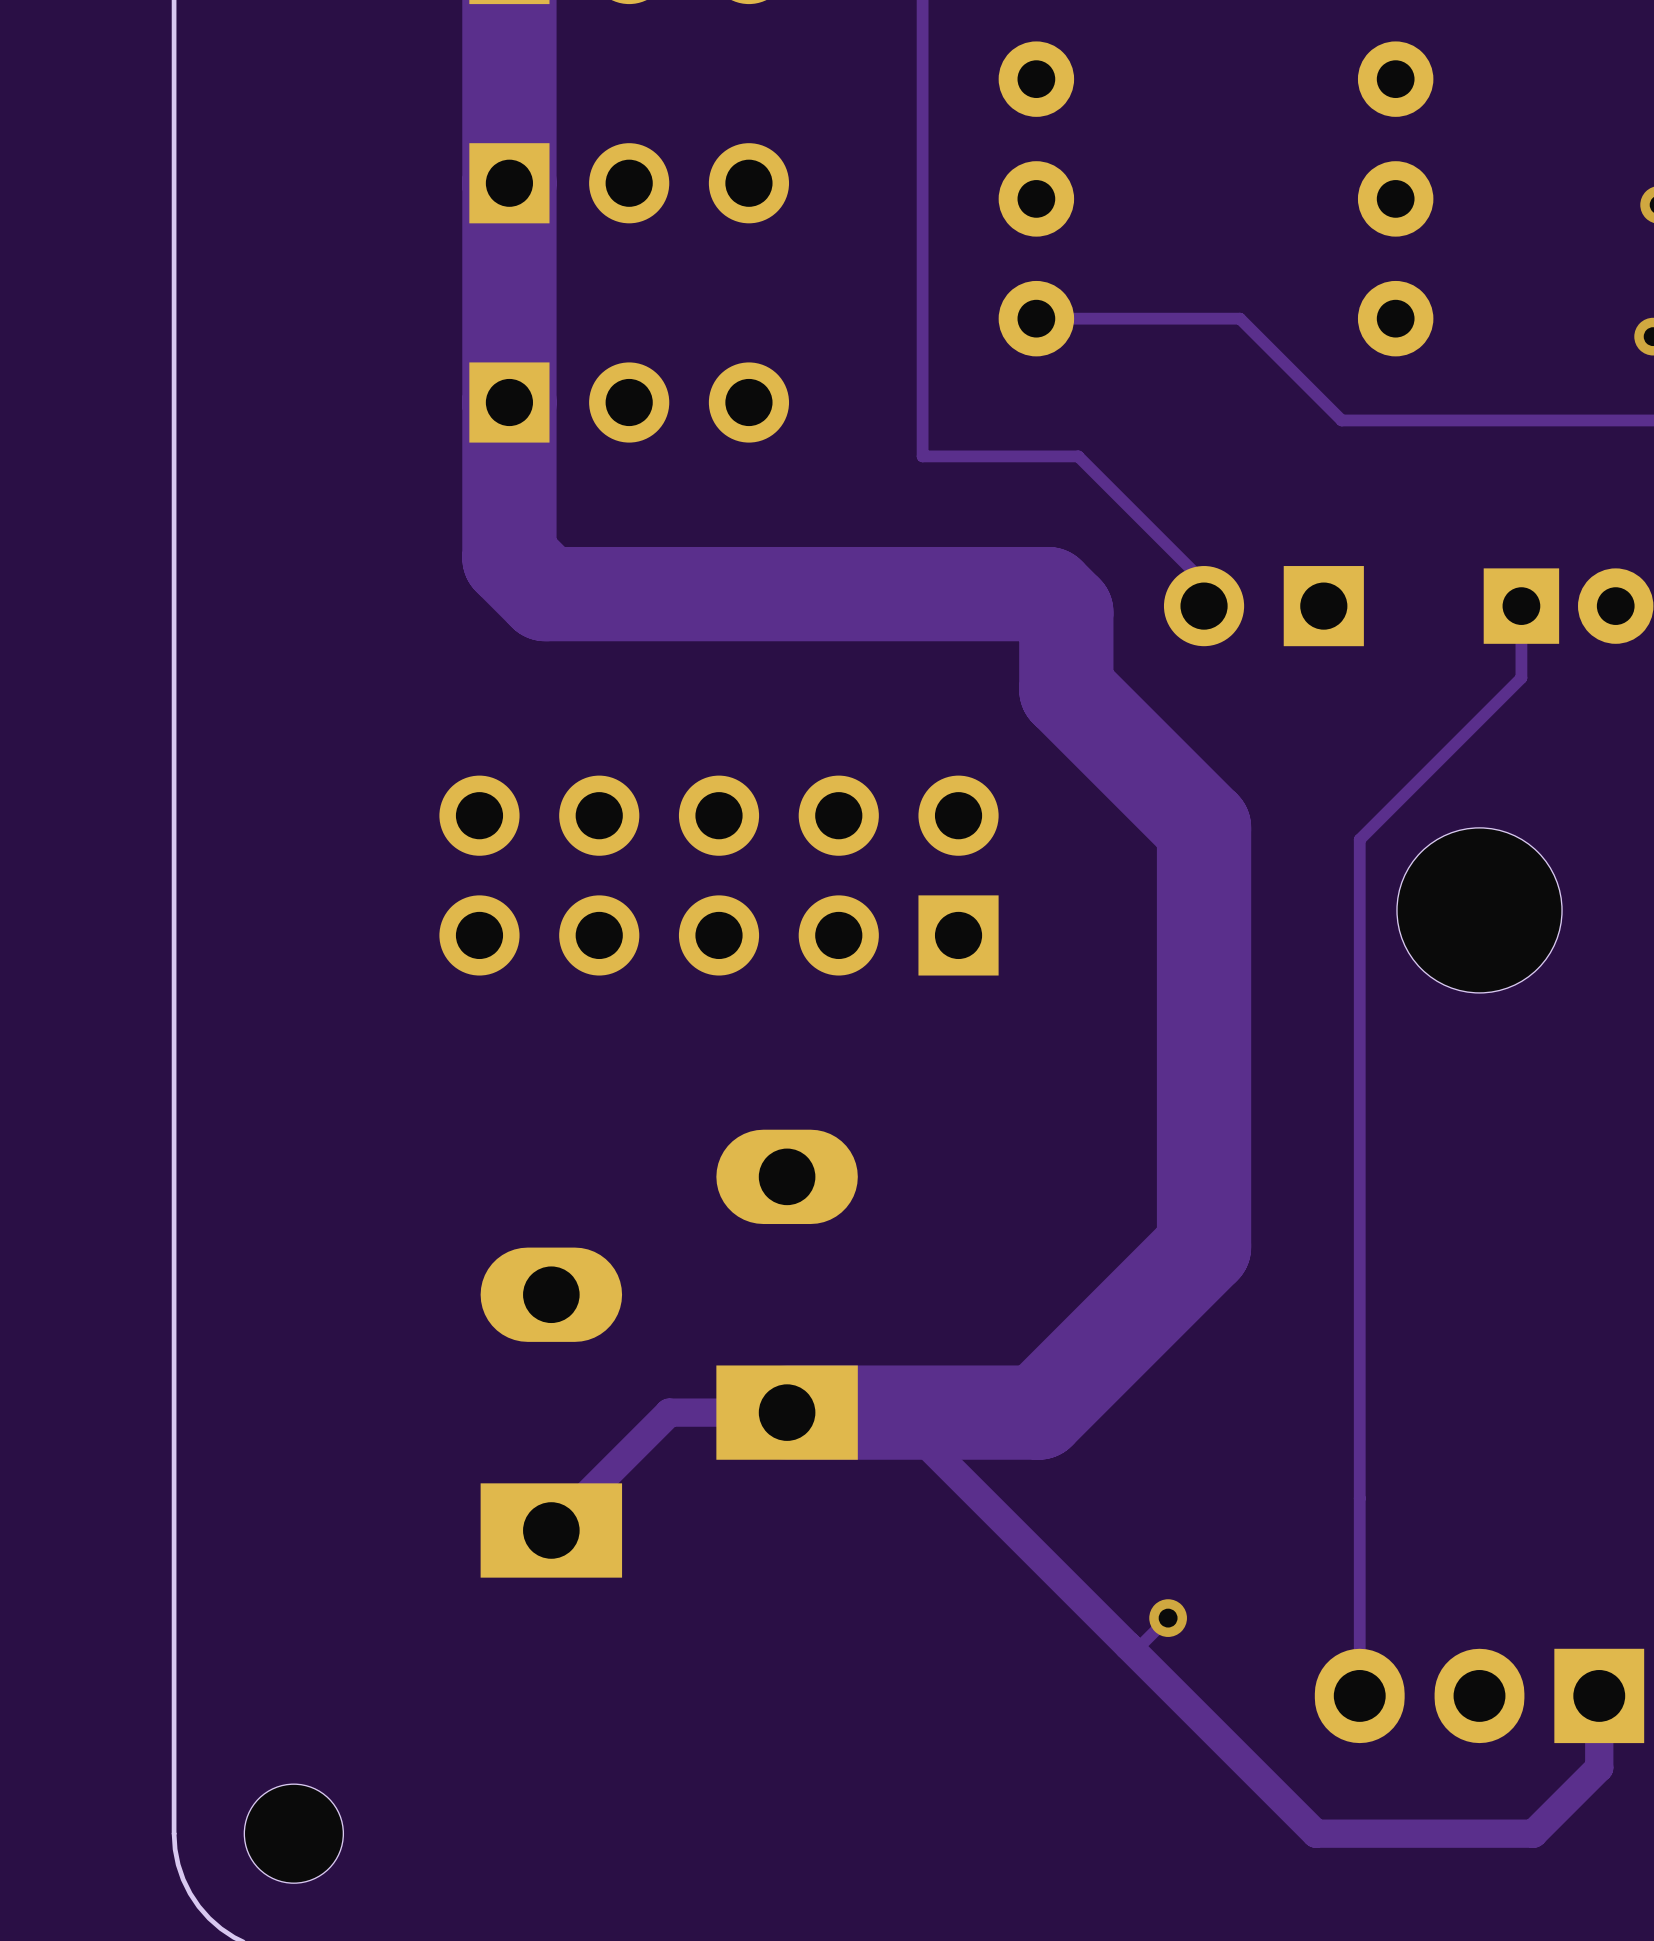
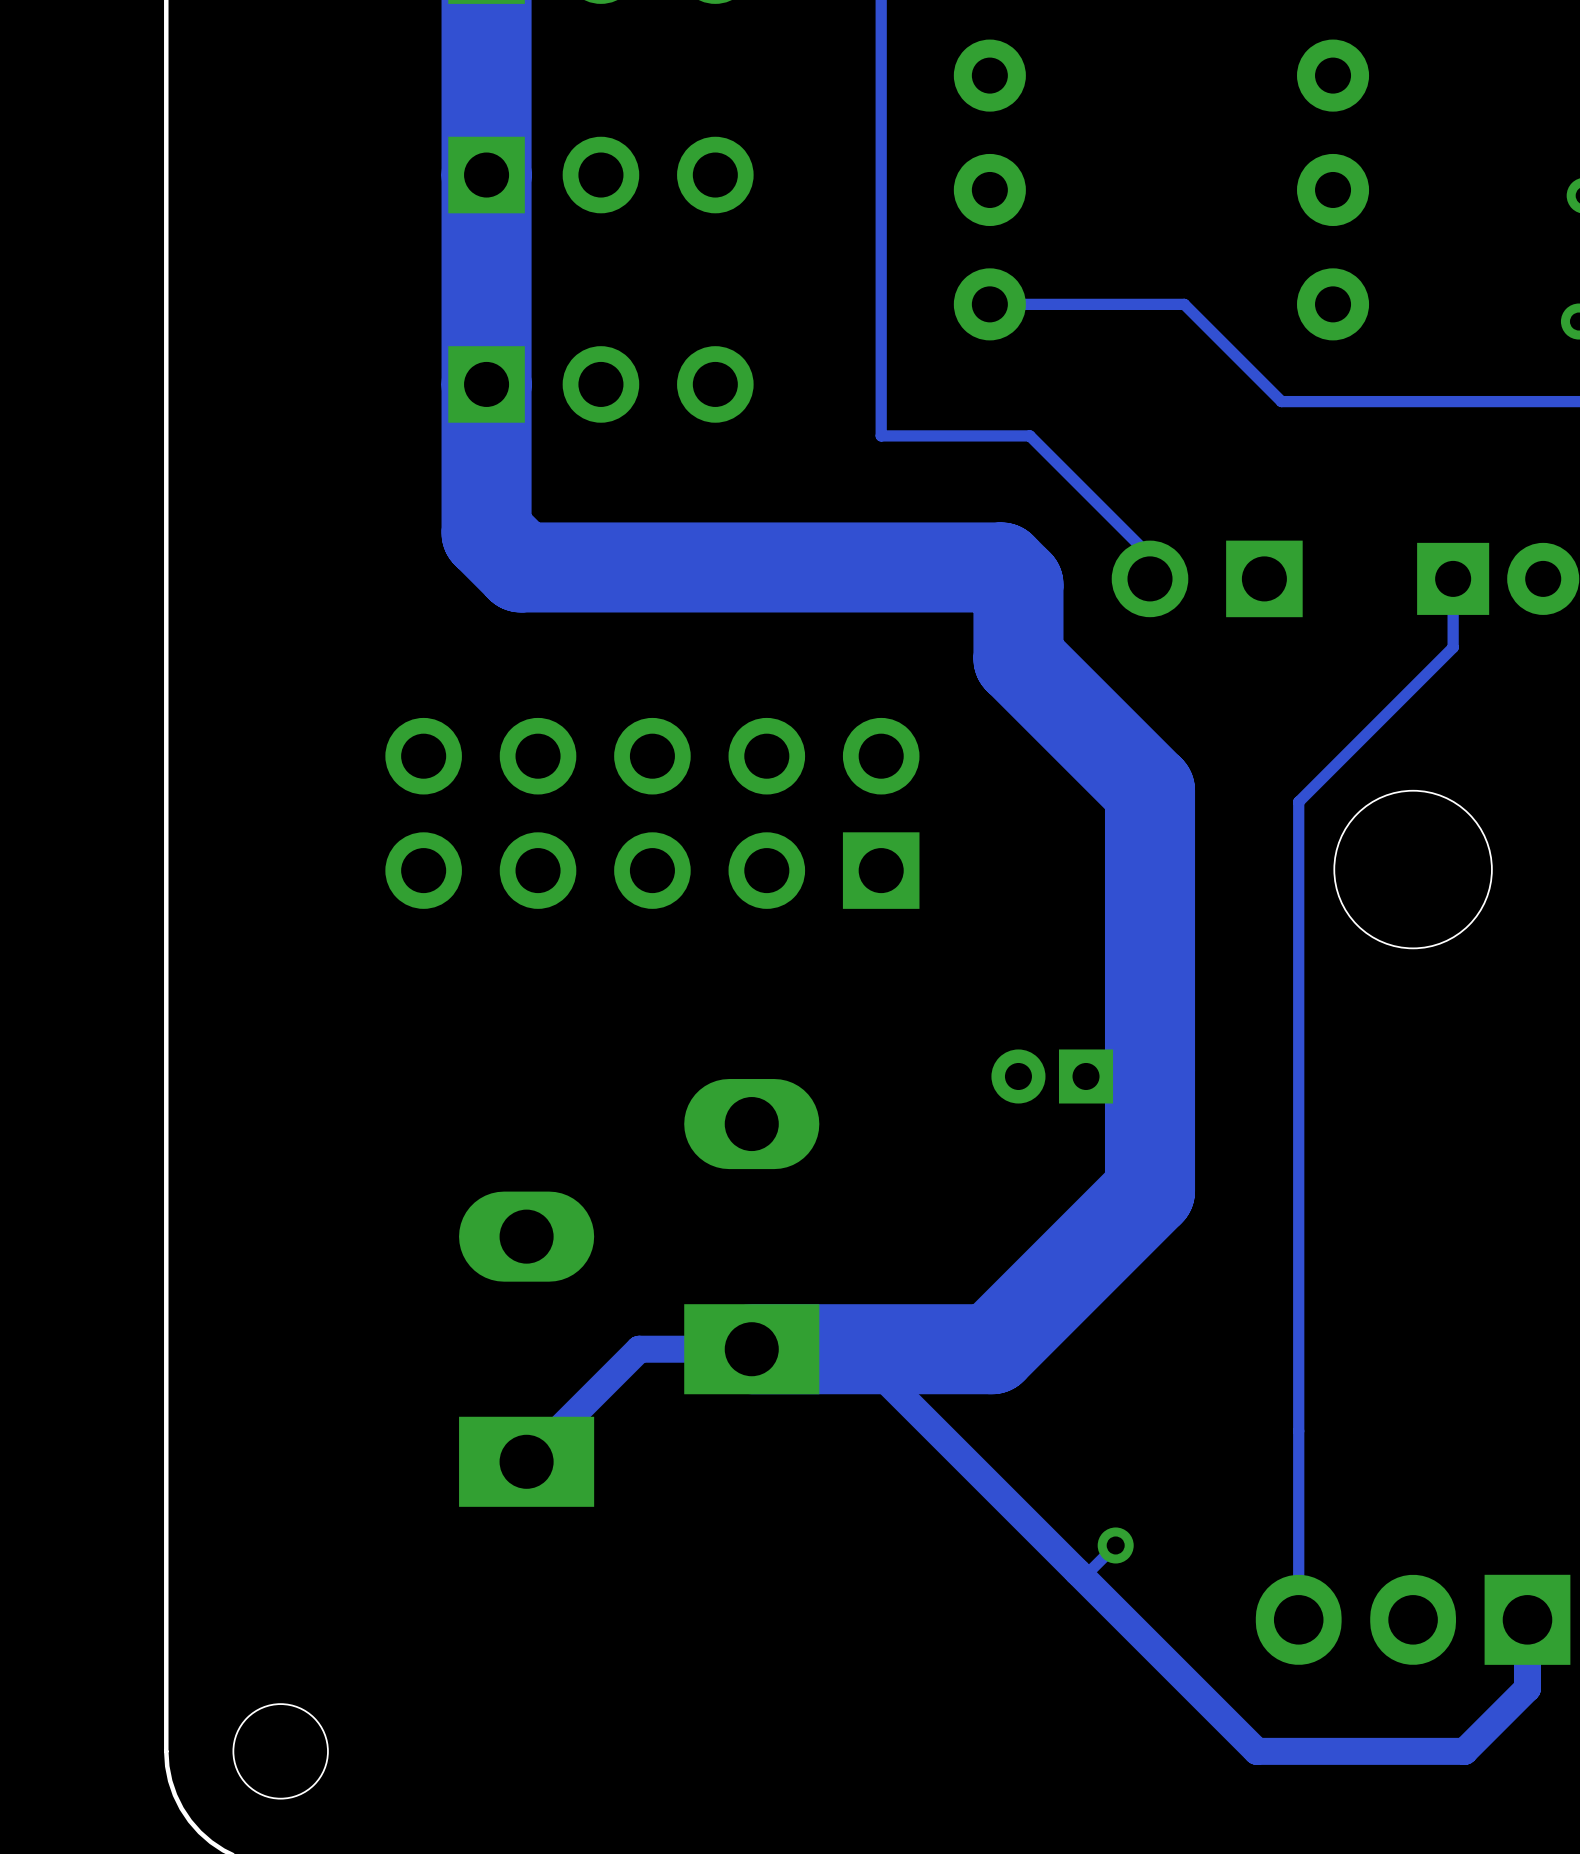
part position: (719, 875) -> (652, 813)
part: none -> (1052, 1076)

